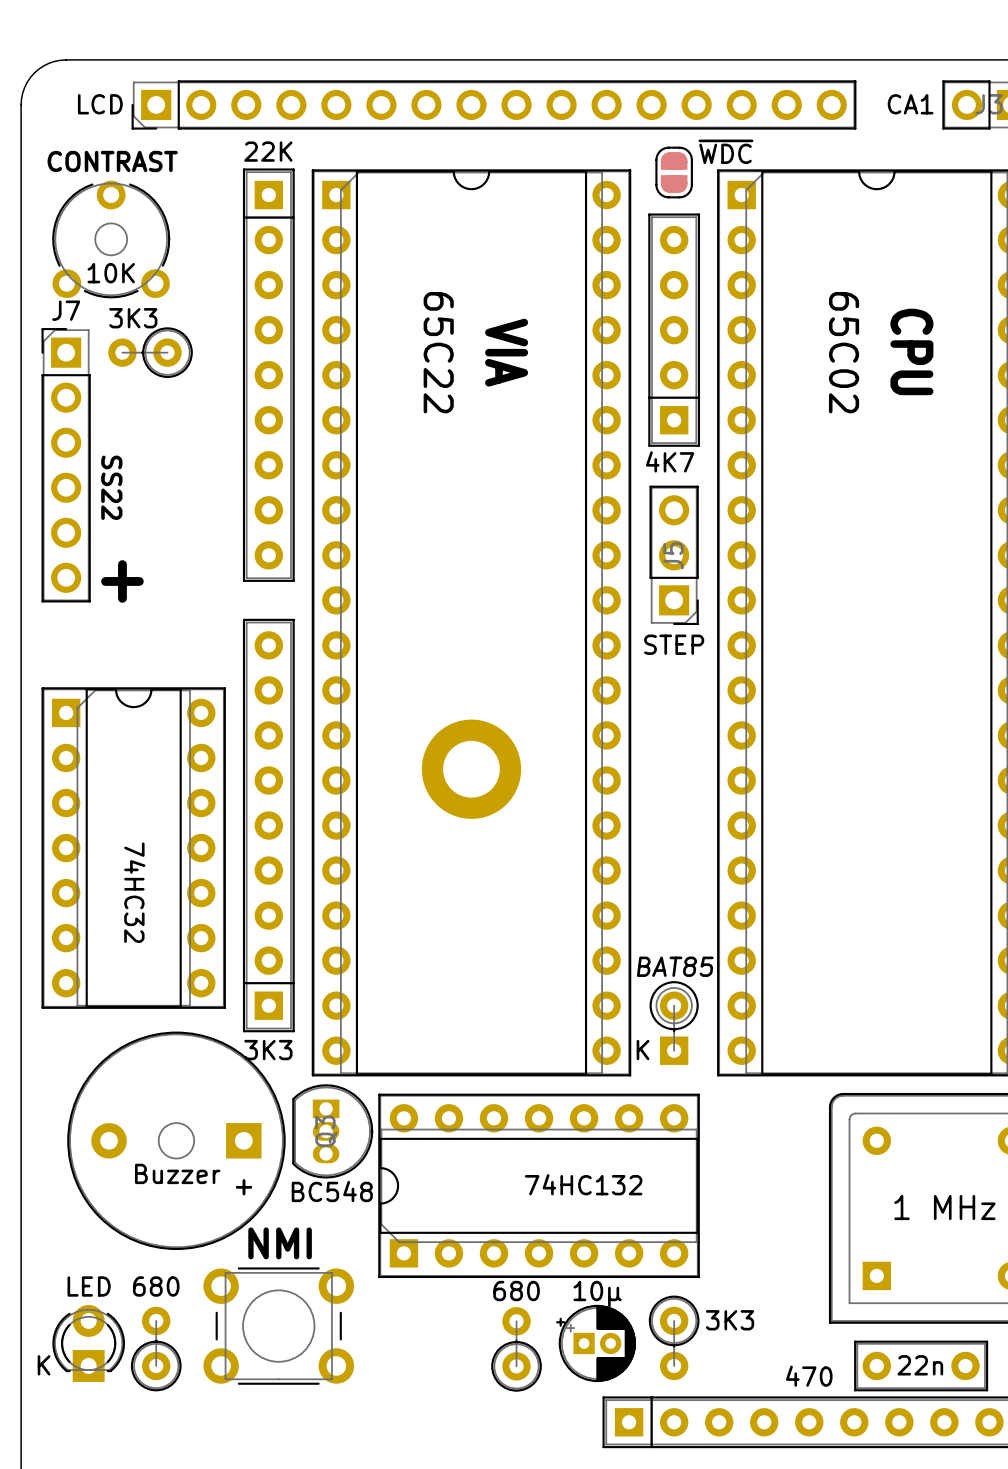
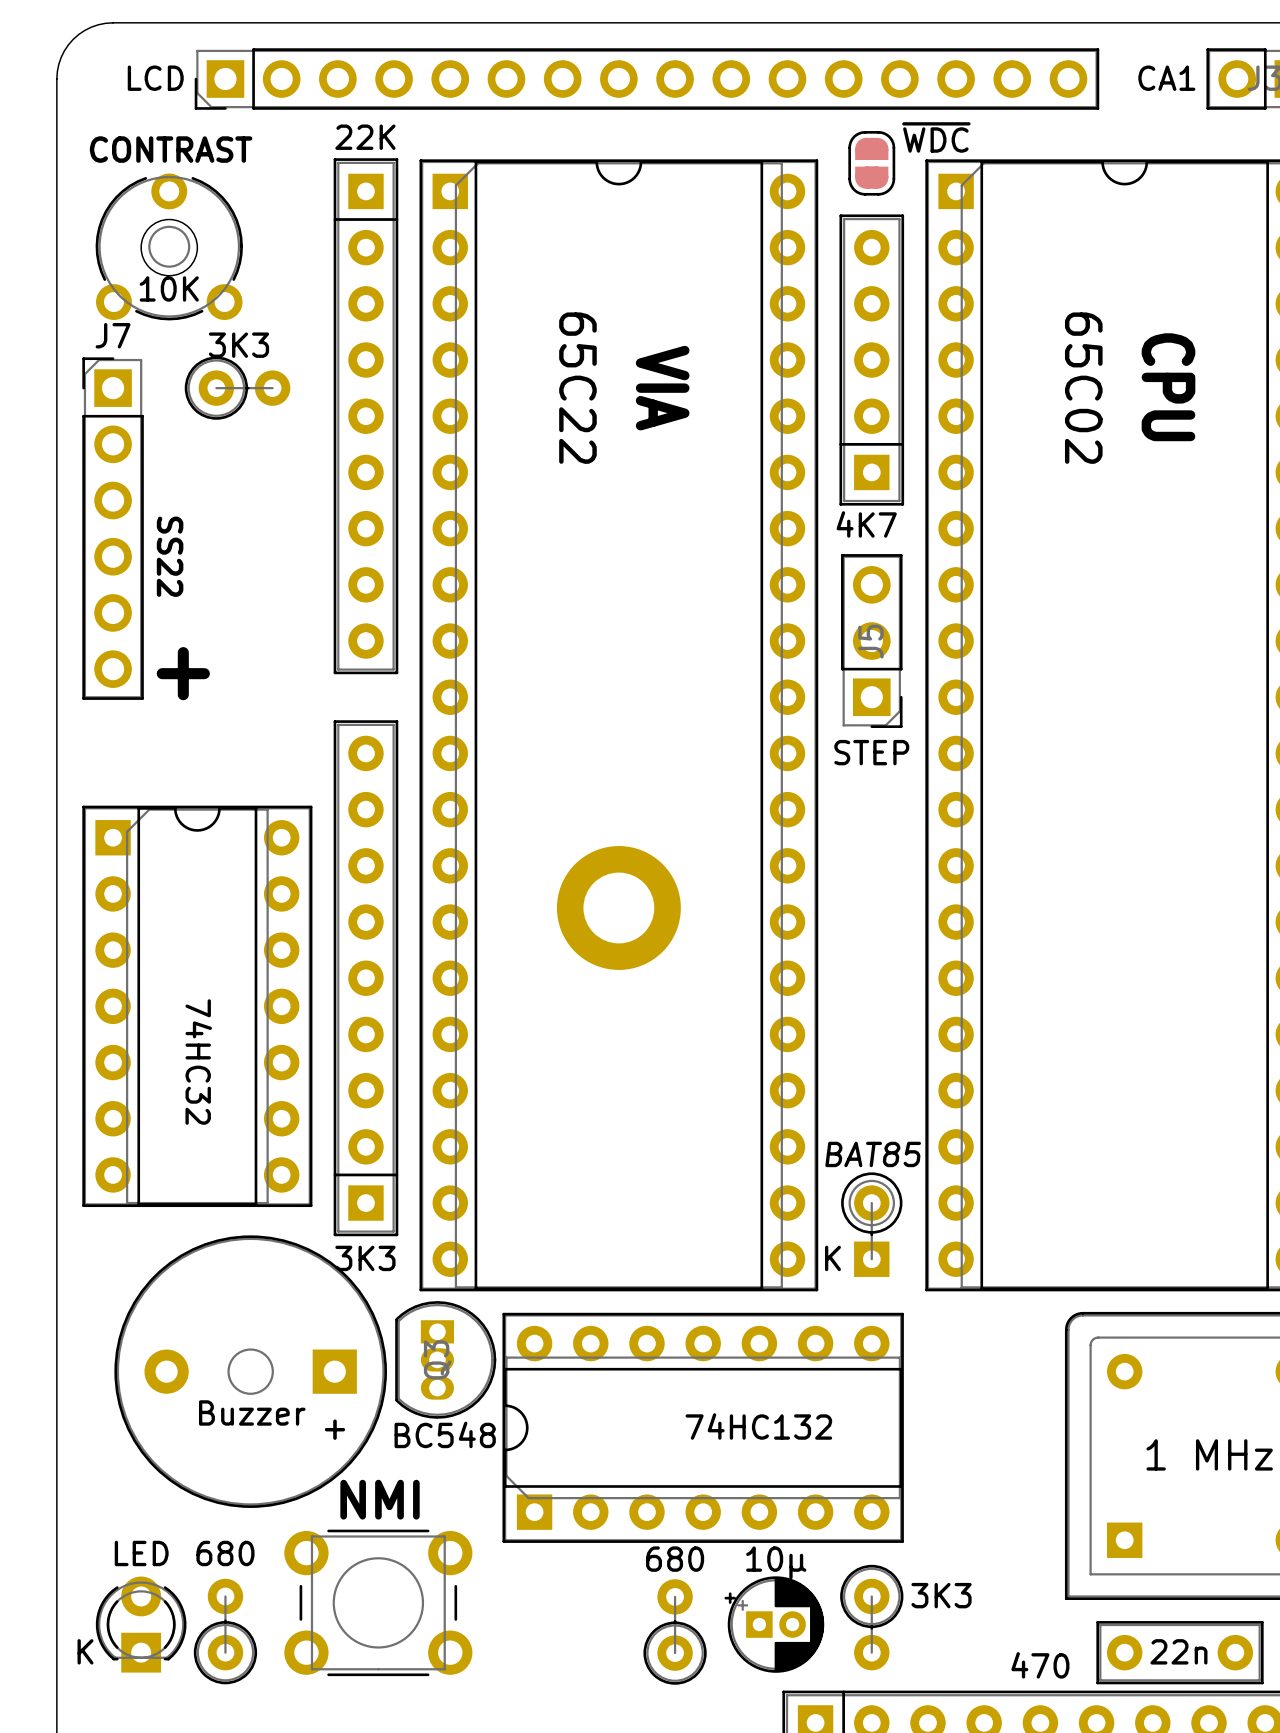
round board edge: none -> [140, 218, 198, 277]
part rotation: 0° (150, 352) -> 180° (237, 388)

